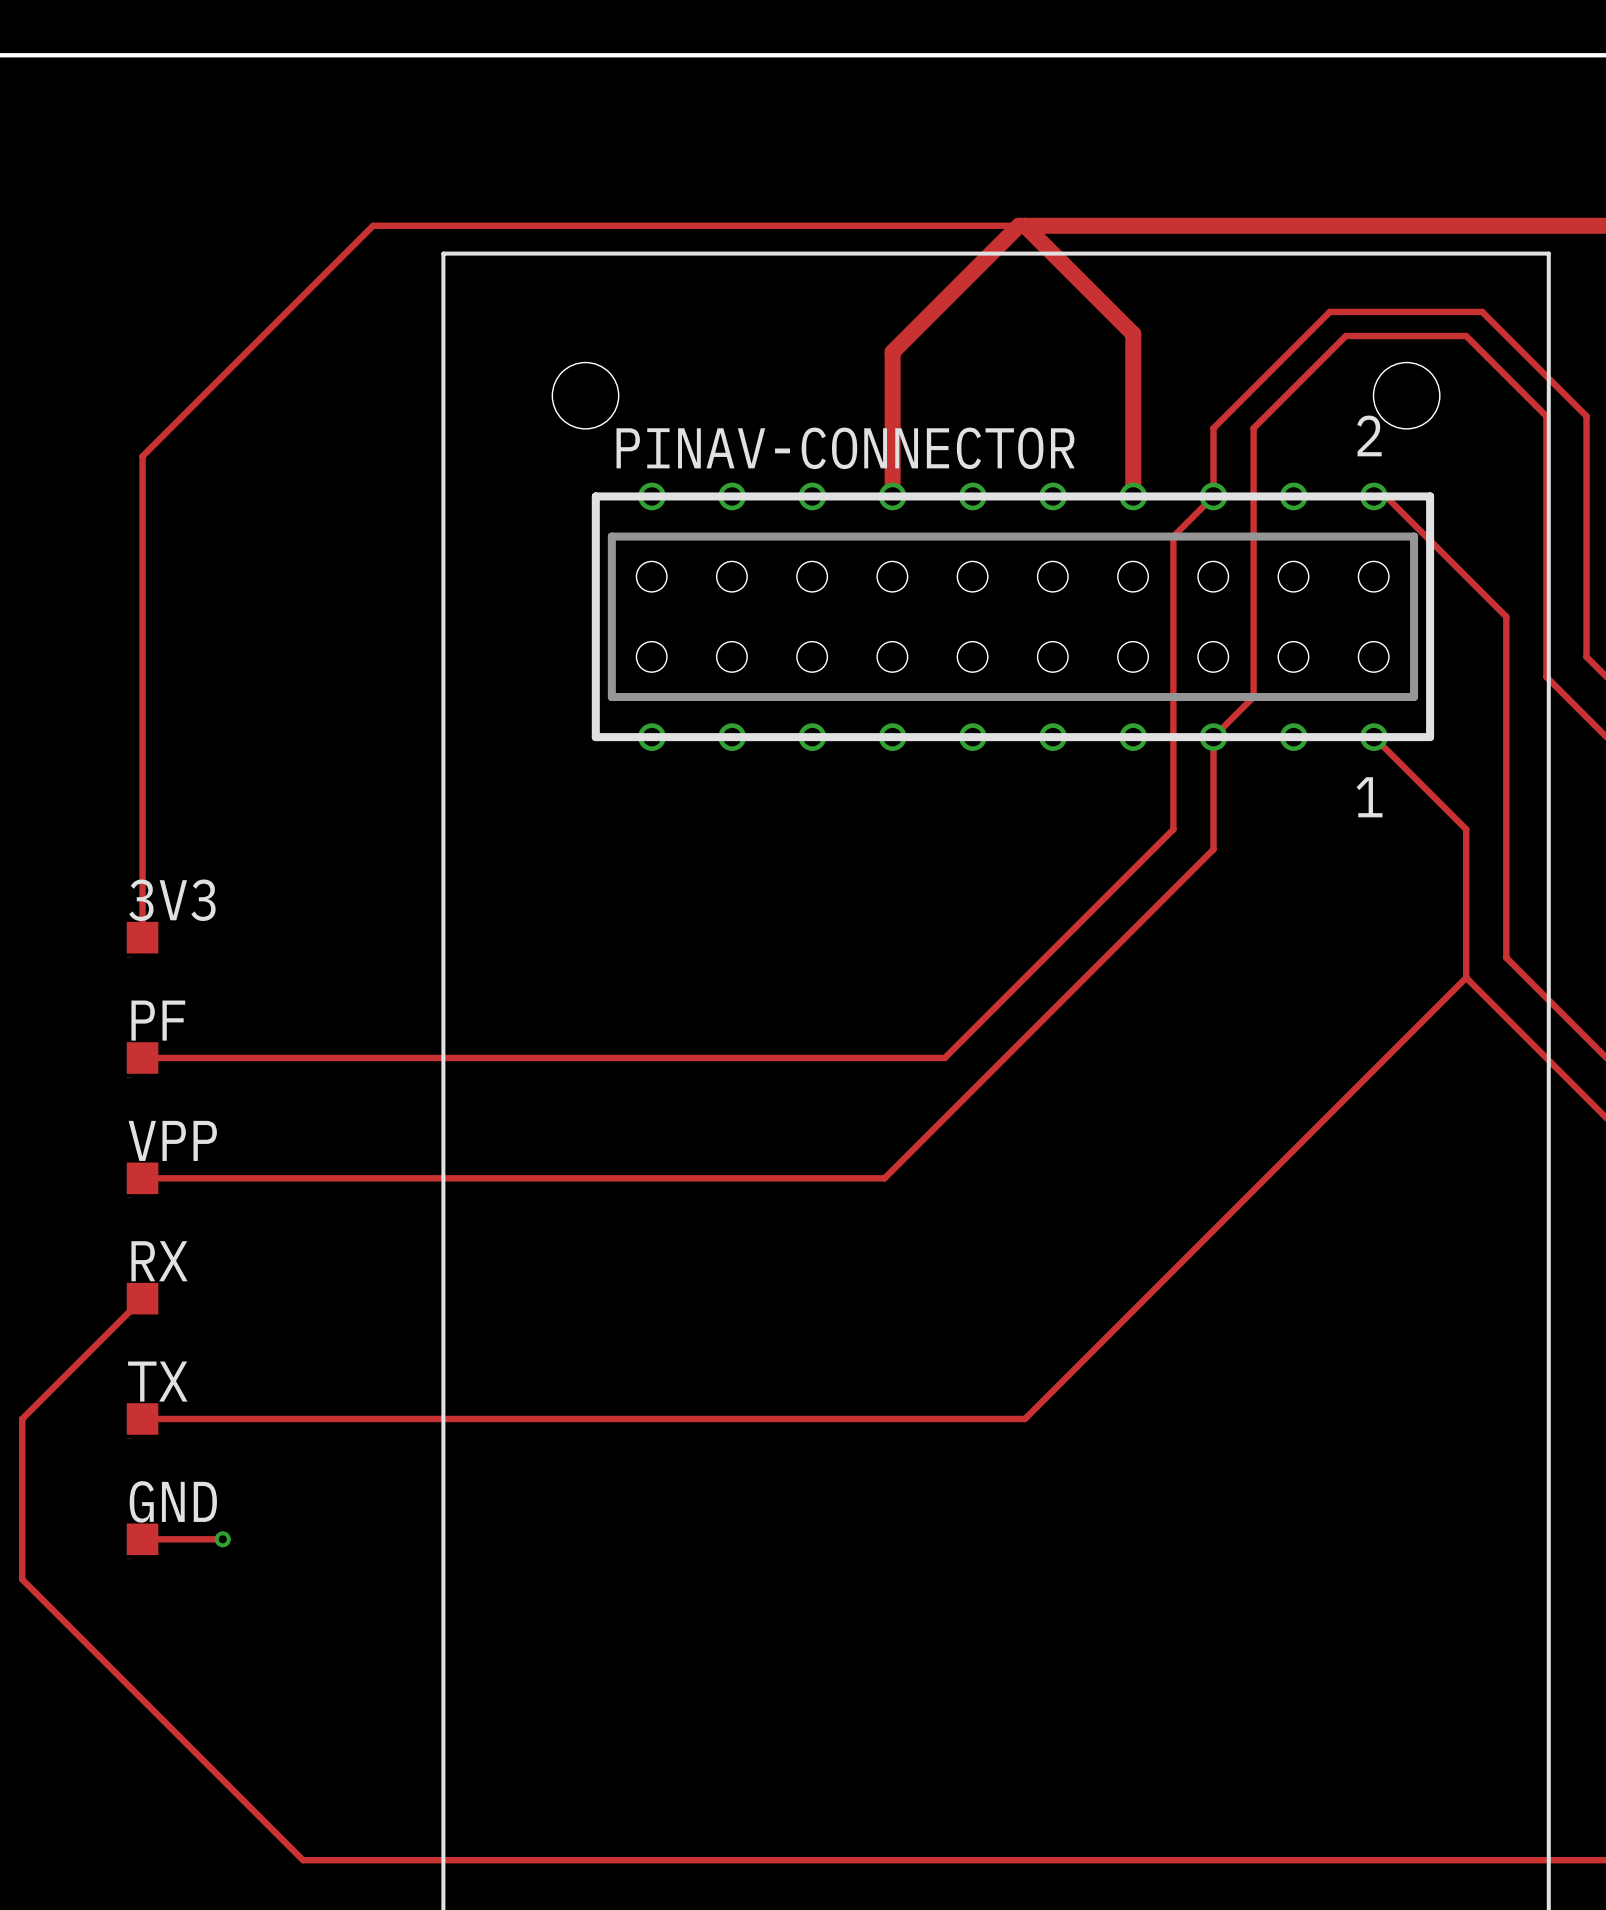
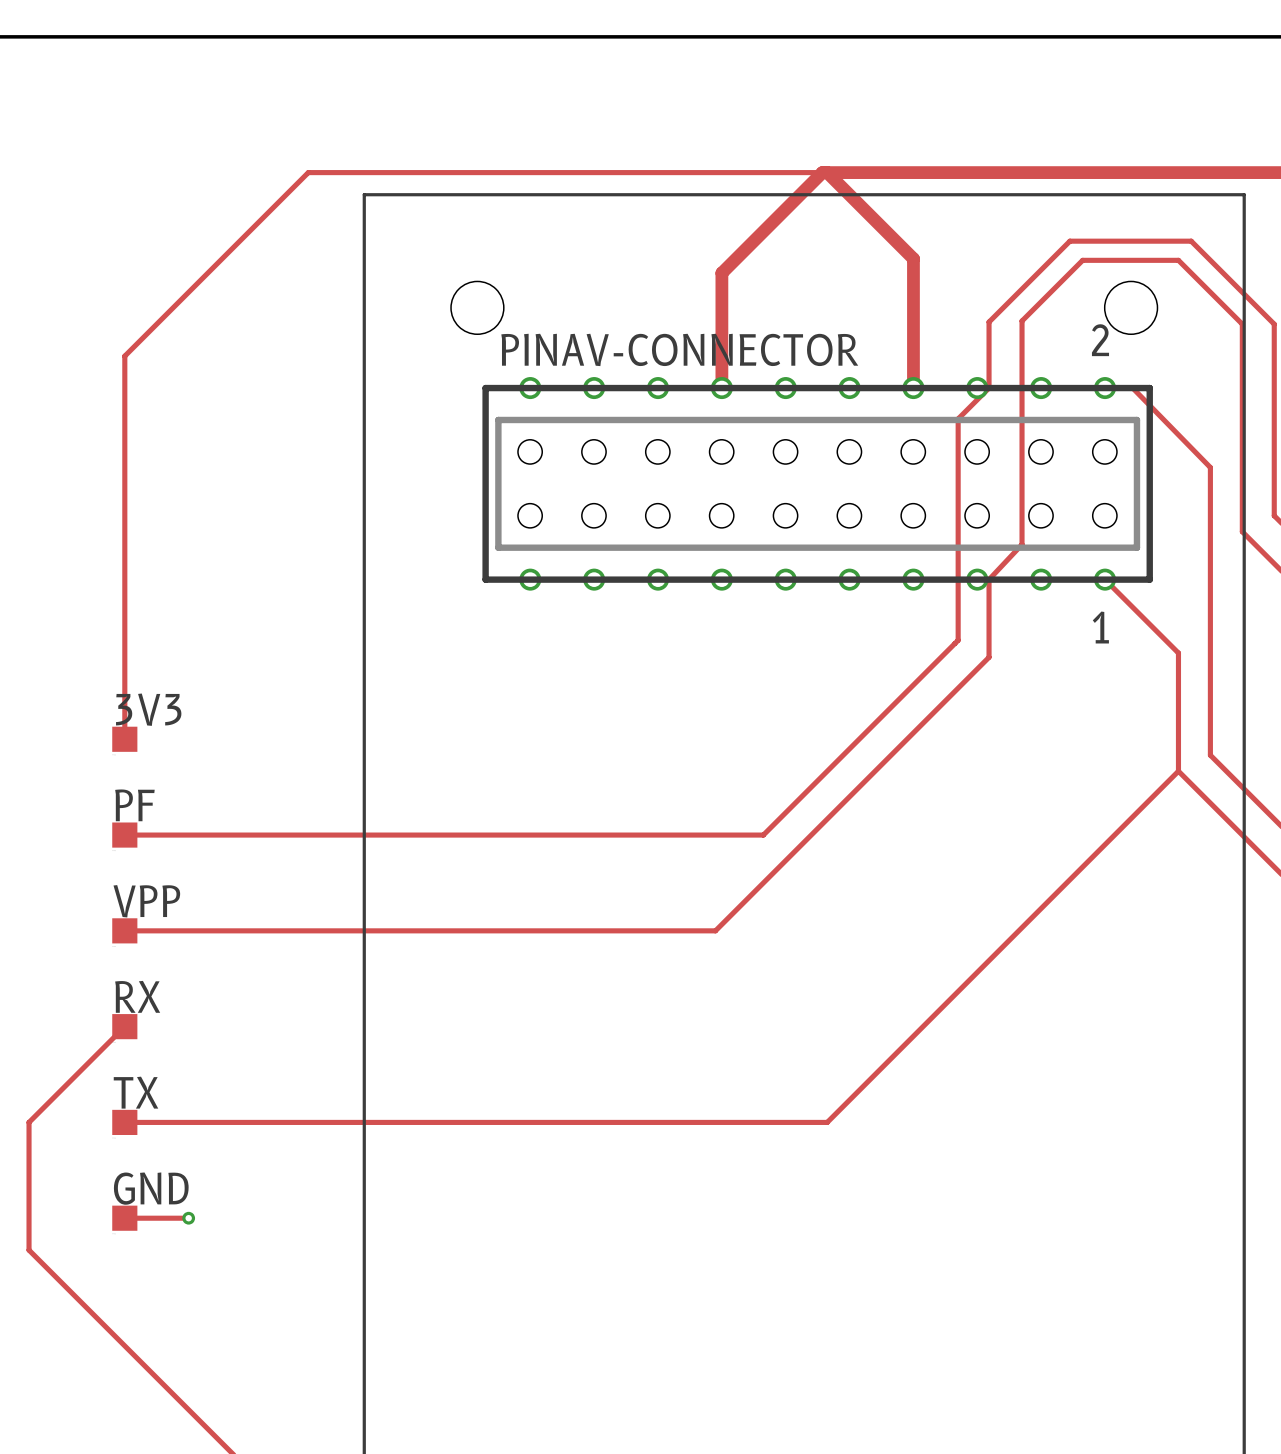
track: (1269, 412) (1253, 428) (1253, 697) (1213, 737) (1213, 849) -> (1022, 321) (1022, 544) (989, 579) (989, 657) (977, 669)
track: (1228, 413) (1213, 428) (1213, 496) (1173, 536) (1173, 829) -> (989, 322) (989, 388) (958, 418) (958, 640) (945, 653)
track: (1373, 496) (1385, 496) (1506, 616) -> (1116, 388) (1132, 388) (1210, 467) (1210, 483)

